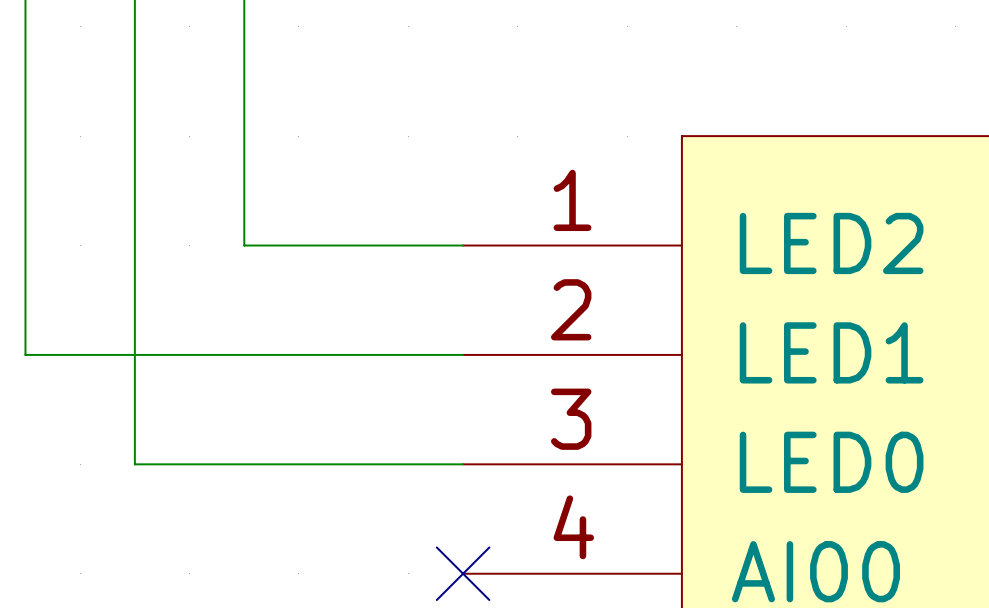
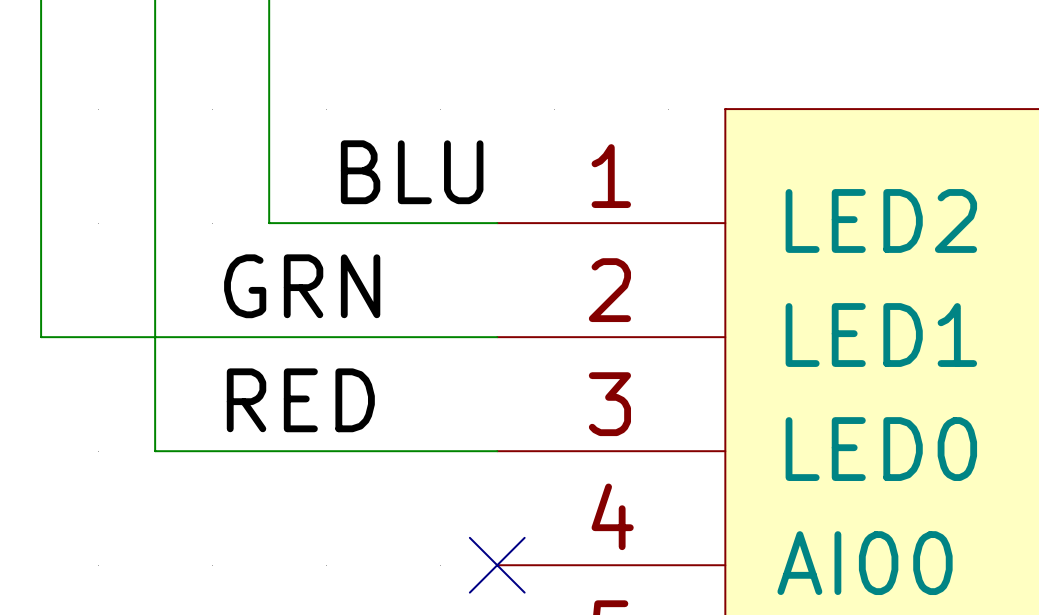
label: none -> BLU (412, 172)
label: none -> GRN (302, 286)
label: none -> RED (300, 400)

